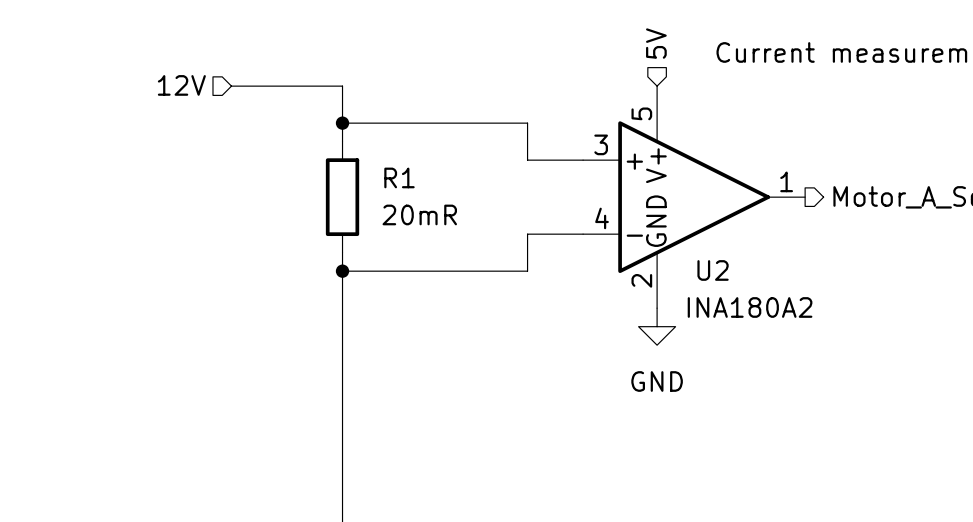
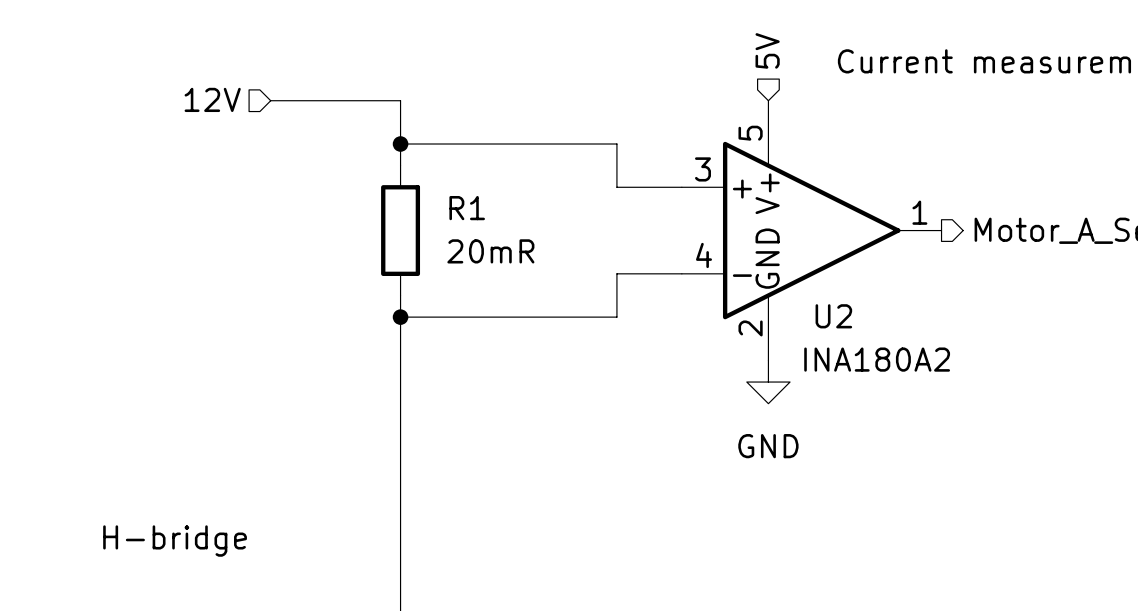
text: none -> H-bridge (175, 541)

